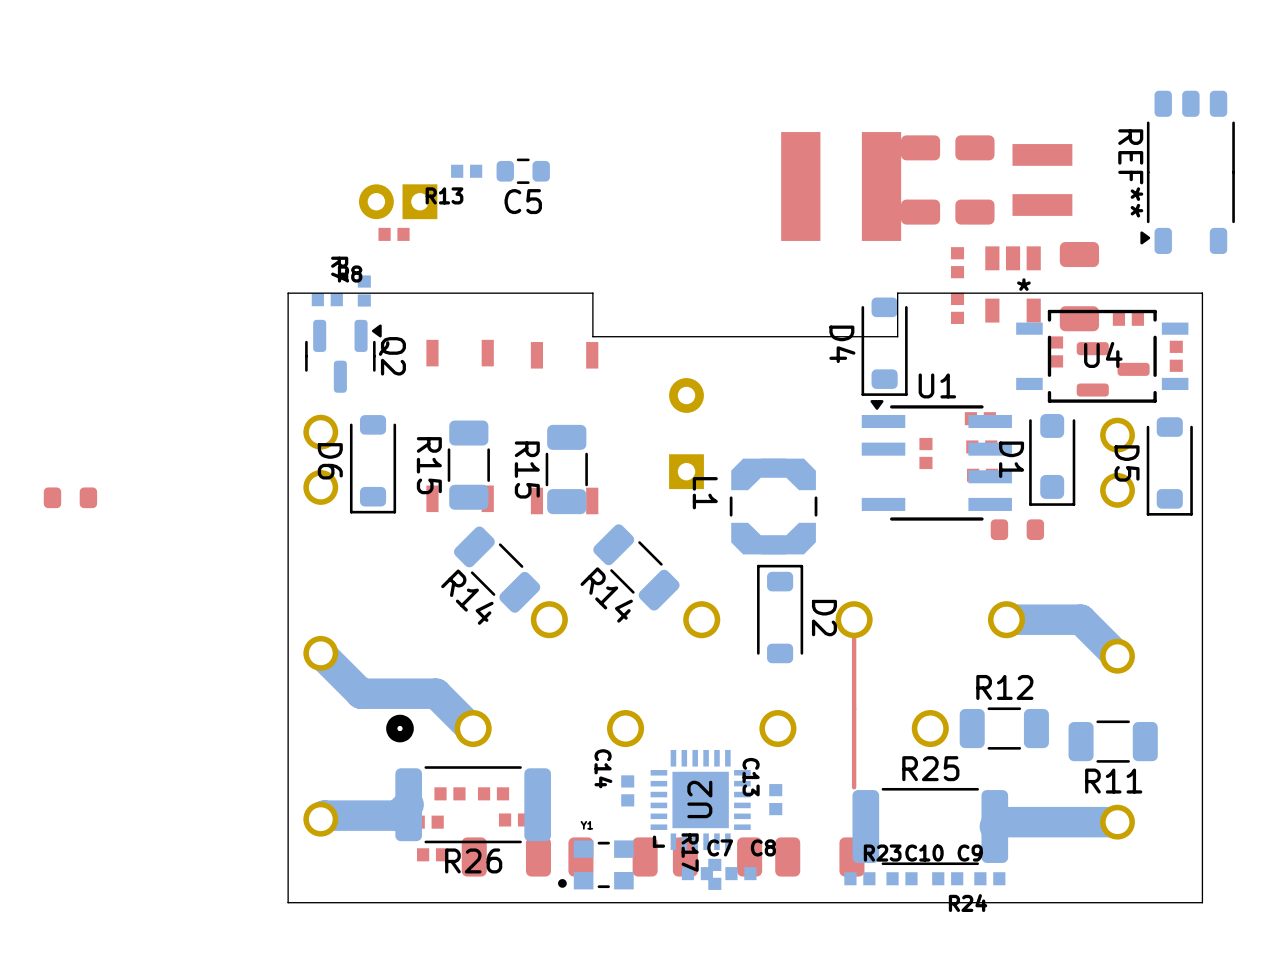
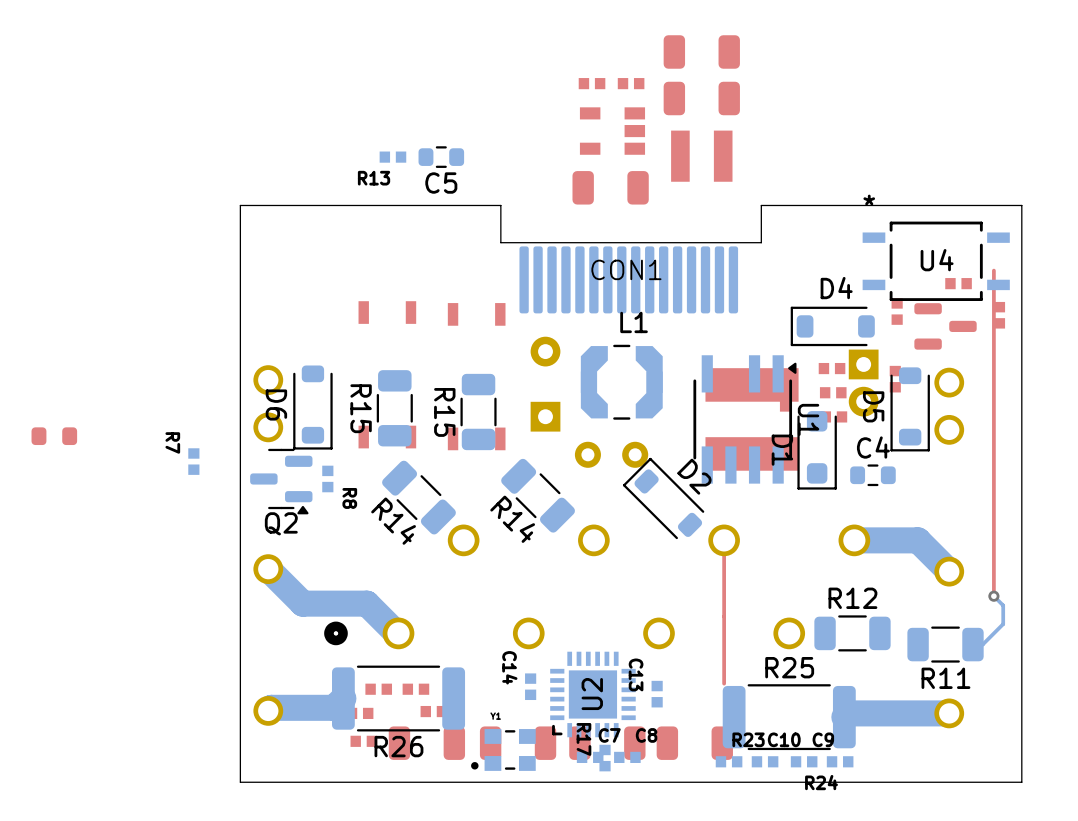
part: none -> (701, 51)
part: none -> (592, 83)
part: none -> (631, 83)
part: none -> (701, 98)
part footprint: [781, 132, 902, 241] -> [671, 130, 733, 182]
REF**: (1187, 172) -> none
part: (920, 179) -> none
part: (974, 179) -> none
part: (1042, 179) -> none
part: (398, 201) -> none
part: none -> (610, 187)
part: (394, 234) -> none
part: (957, 262) -> none
part rotation: 0° (1013, 284) -> 90° clockwise (612, 131)
part position: (1013, 284) -> (612, 131)
part: (1079, 286) -> none
R7 position: (364, 290) -> (193, 461)
board edge: (1202, 293) (897, 293) (897, 336) (592, 336) (592, 293) (288, 293) -> (1021, 261) (1021, 205) (761, 205) (761, 242) (500, 242) (500, 205) (240, 205) (240, 261)
R8 rotation: 0° (327, 299) -> 90° clockwise (327, 478)
R8 position: (327, 299) -> (327, 478)
top track: none -> (993, 270) (993, 596)
part: (957, 308) -> none
CON1: none -> (628, 279)
D4 rotation: 0° (884, 346) -> 90° clockwise (832, 326)
D4 position: (884, 346) -> (832, 326)
Q2 rotation: 0° (343, 356) -> 90° clockwise (281, 481)
Q2 position: (343, 356) -> (281, 481)
U4 position: (1102, 356) -> (936, 261)
part: none -> (895, 379)
part position: (686, 433) -> (545, 384)
part: none -> (863, 383)
D1 position: (1052, 459) -> (817, 450)
U1 rotation: 0° (936, 460) -> 90° clockwise (744, 419)
D5 position: (1169, 466) -> (910, 409)
part: none -> (752, 419)
L1 rotation: 0° (773, 506) -> 90° clockwise (621, 382)
L1 position: (773, 506) -> (621, 382)
part: none -> (611, 454)
C4 side: top (1017, 529) -> bottom (872, 475)
D2 rotation: 0° (780, 614) -> 45° counterclockwise (663, 498)
bottom track: none -> (993, 596) (1003, 605) (1003, 624) (982, 644) (972, 644)
via: none -> (993, 596)

